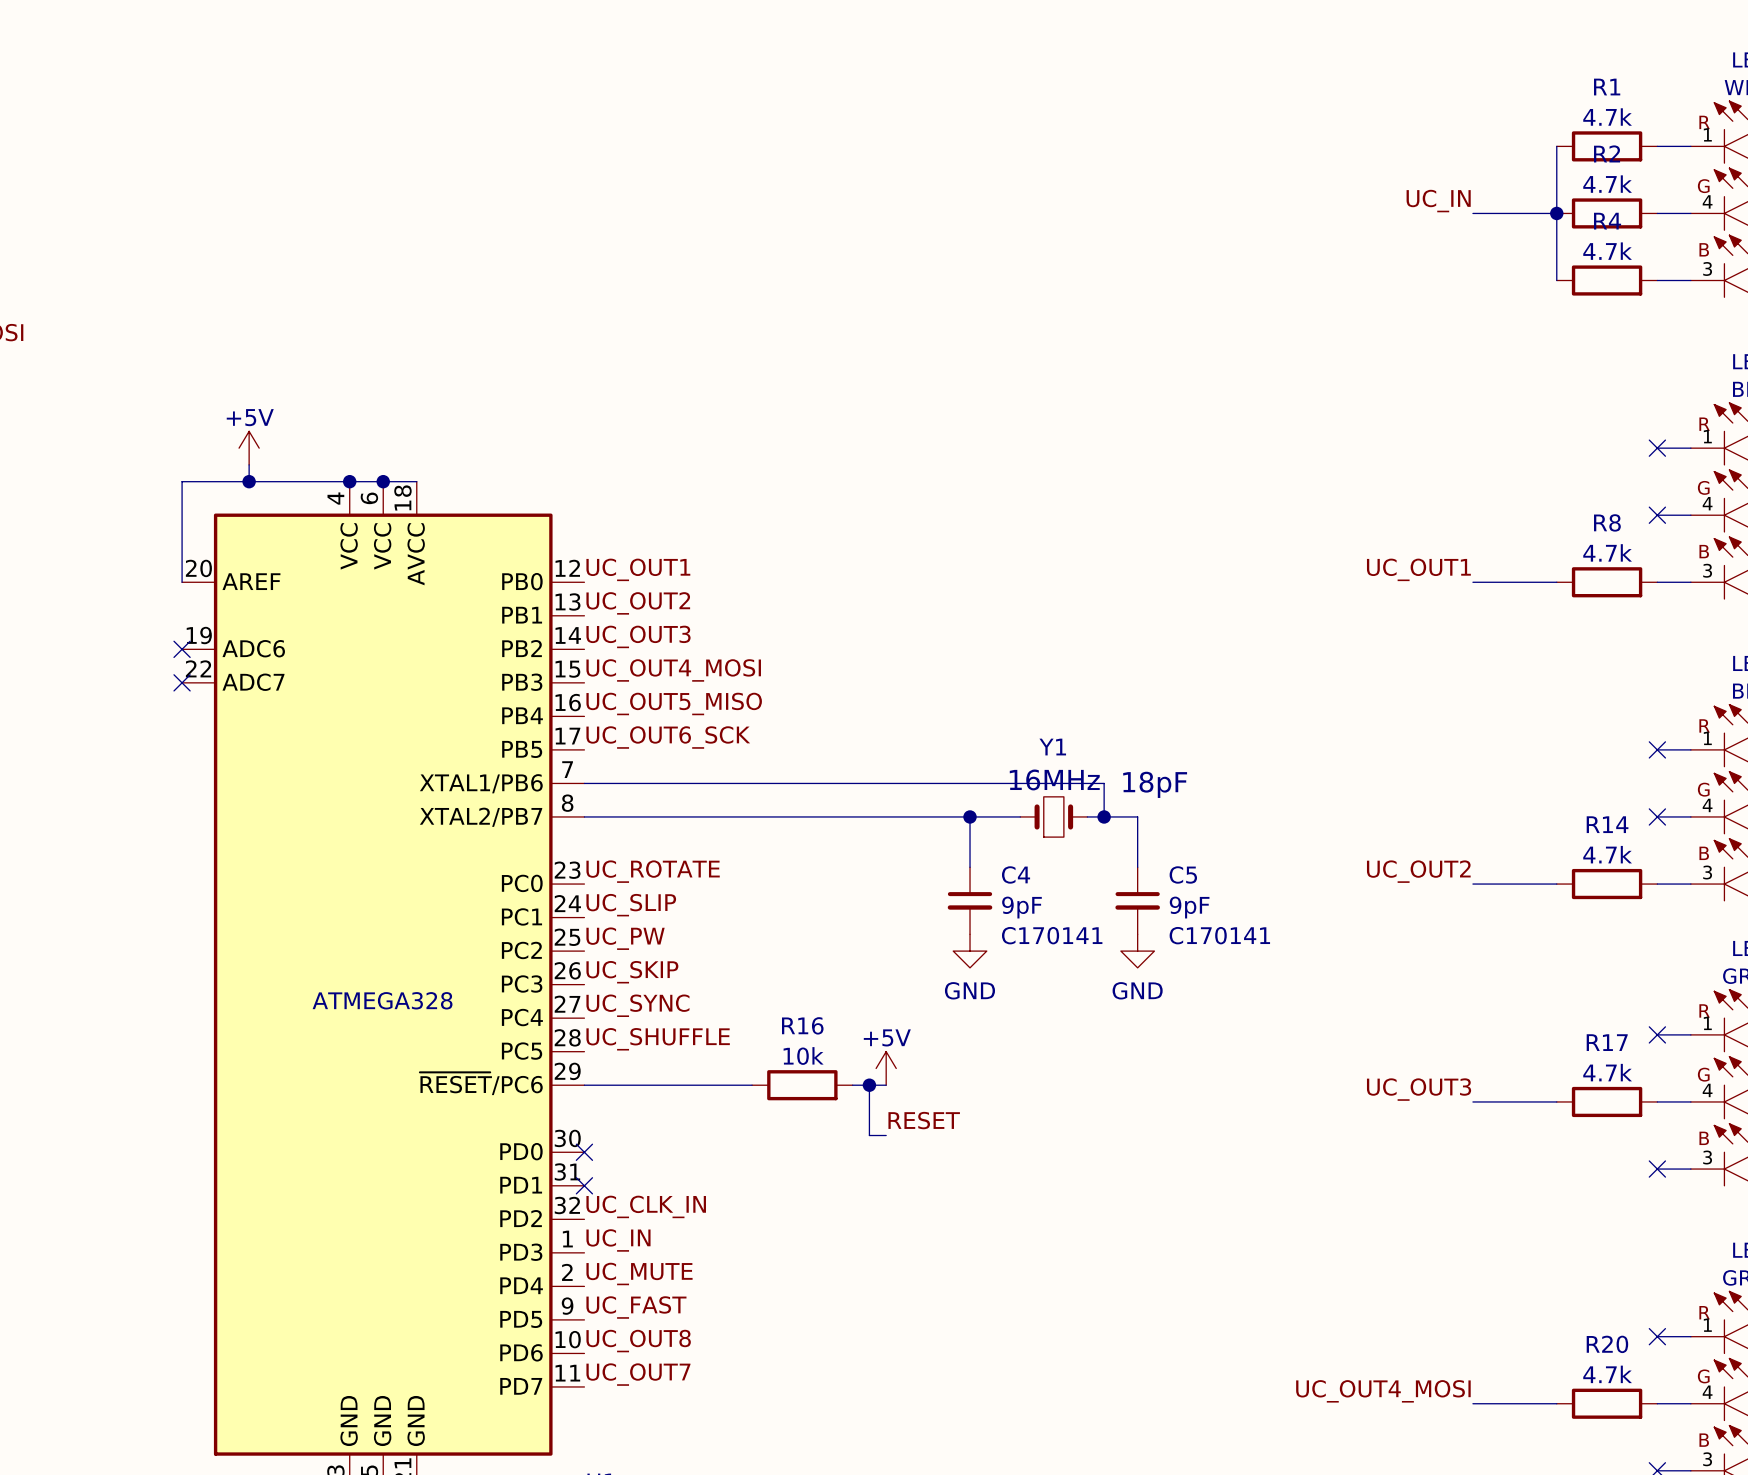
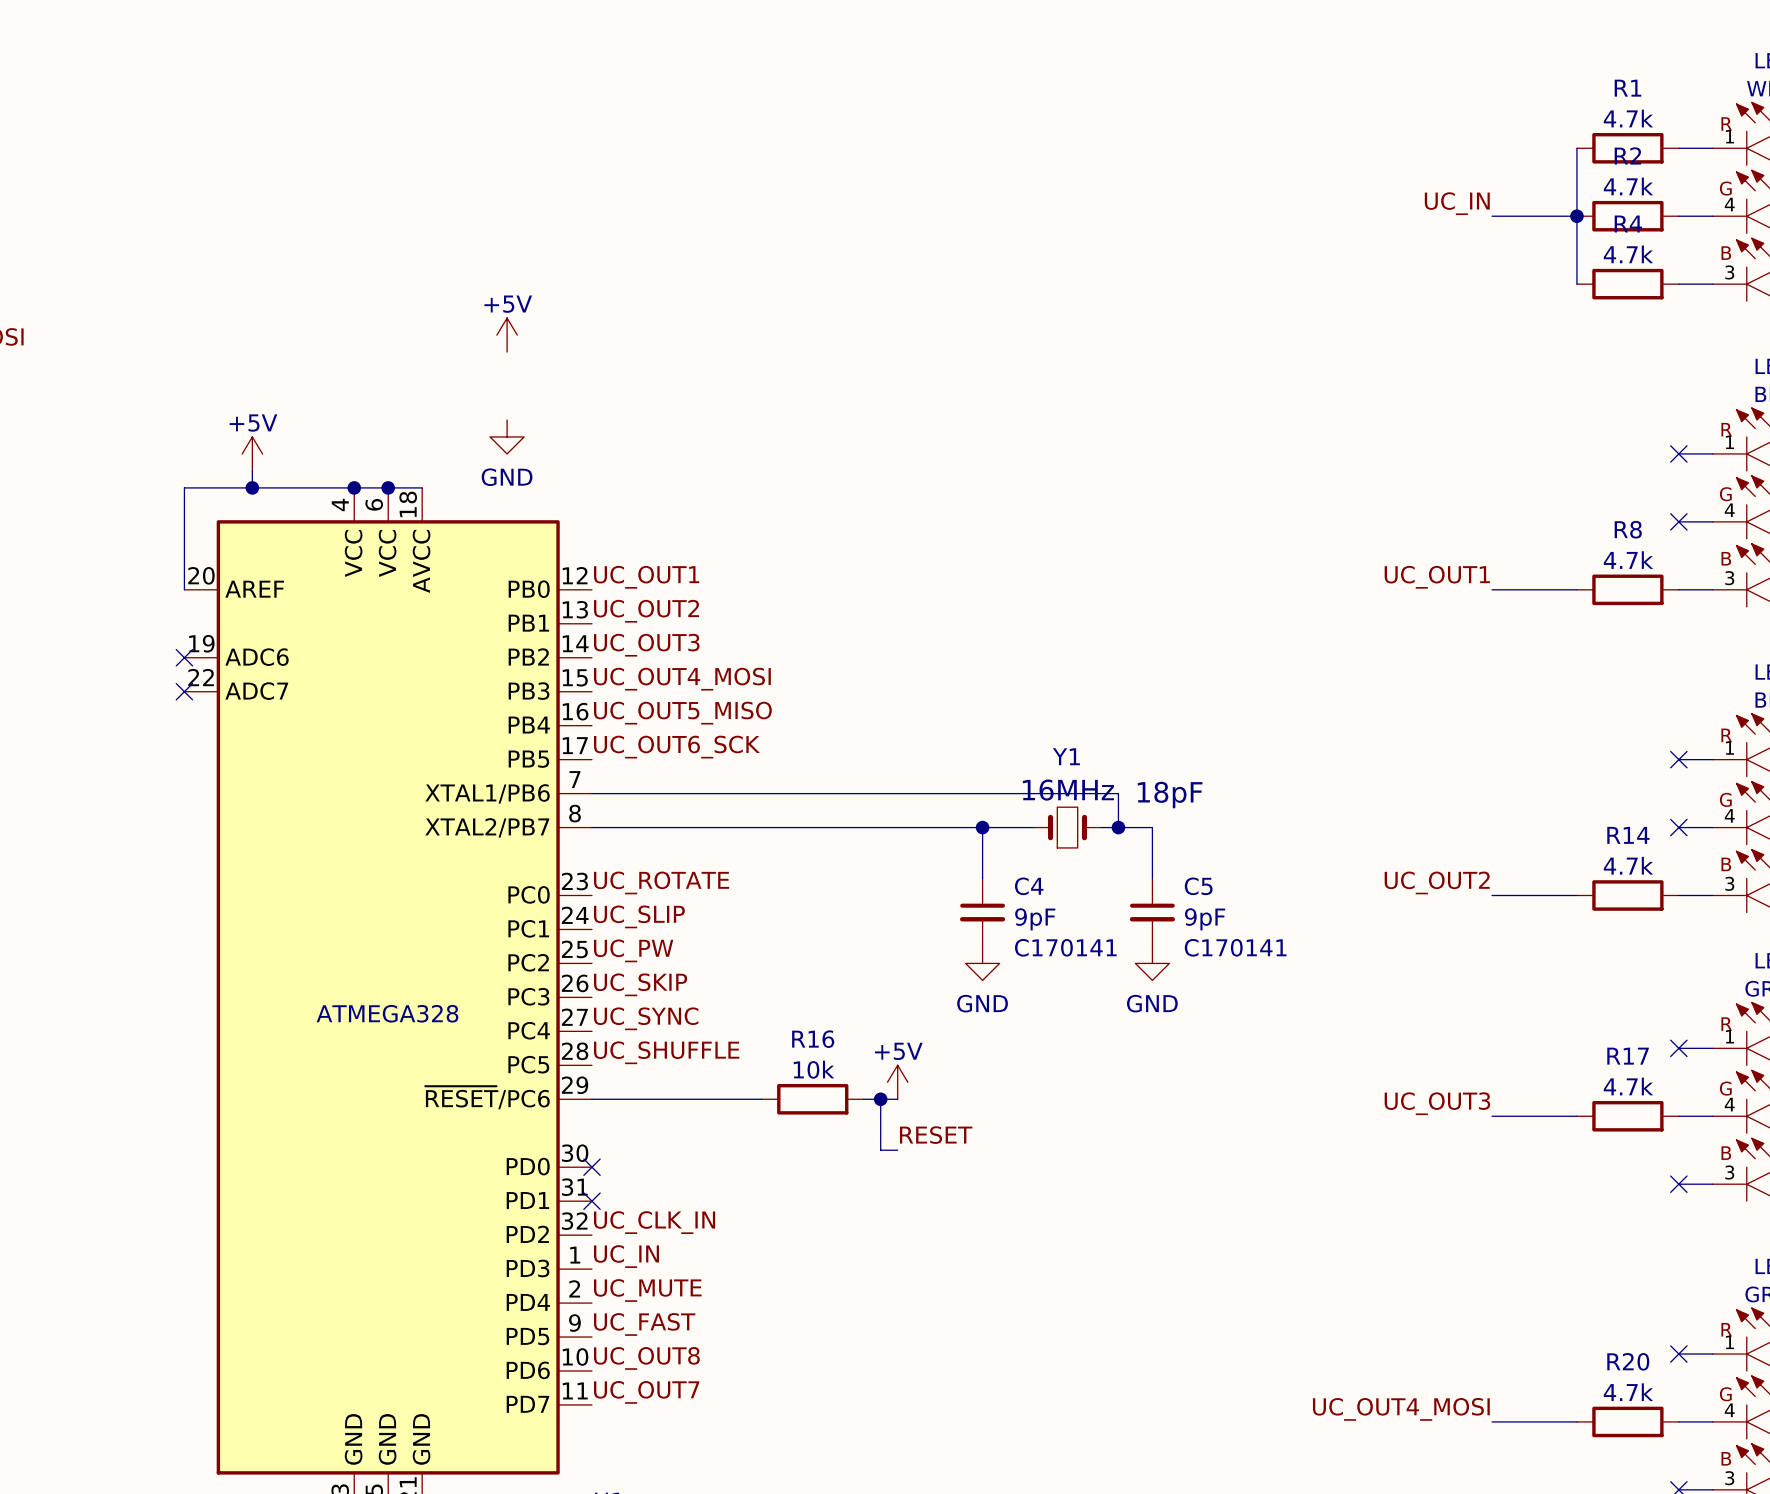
power symbol: none -> +5V (507, 335)
power symbol: none -> GND (507, 436)

